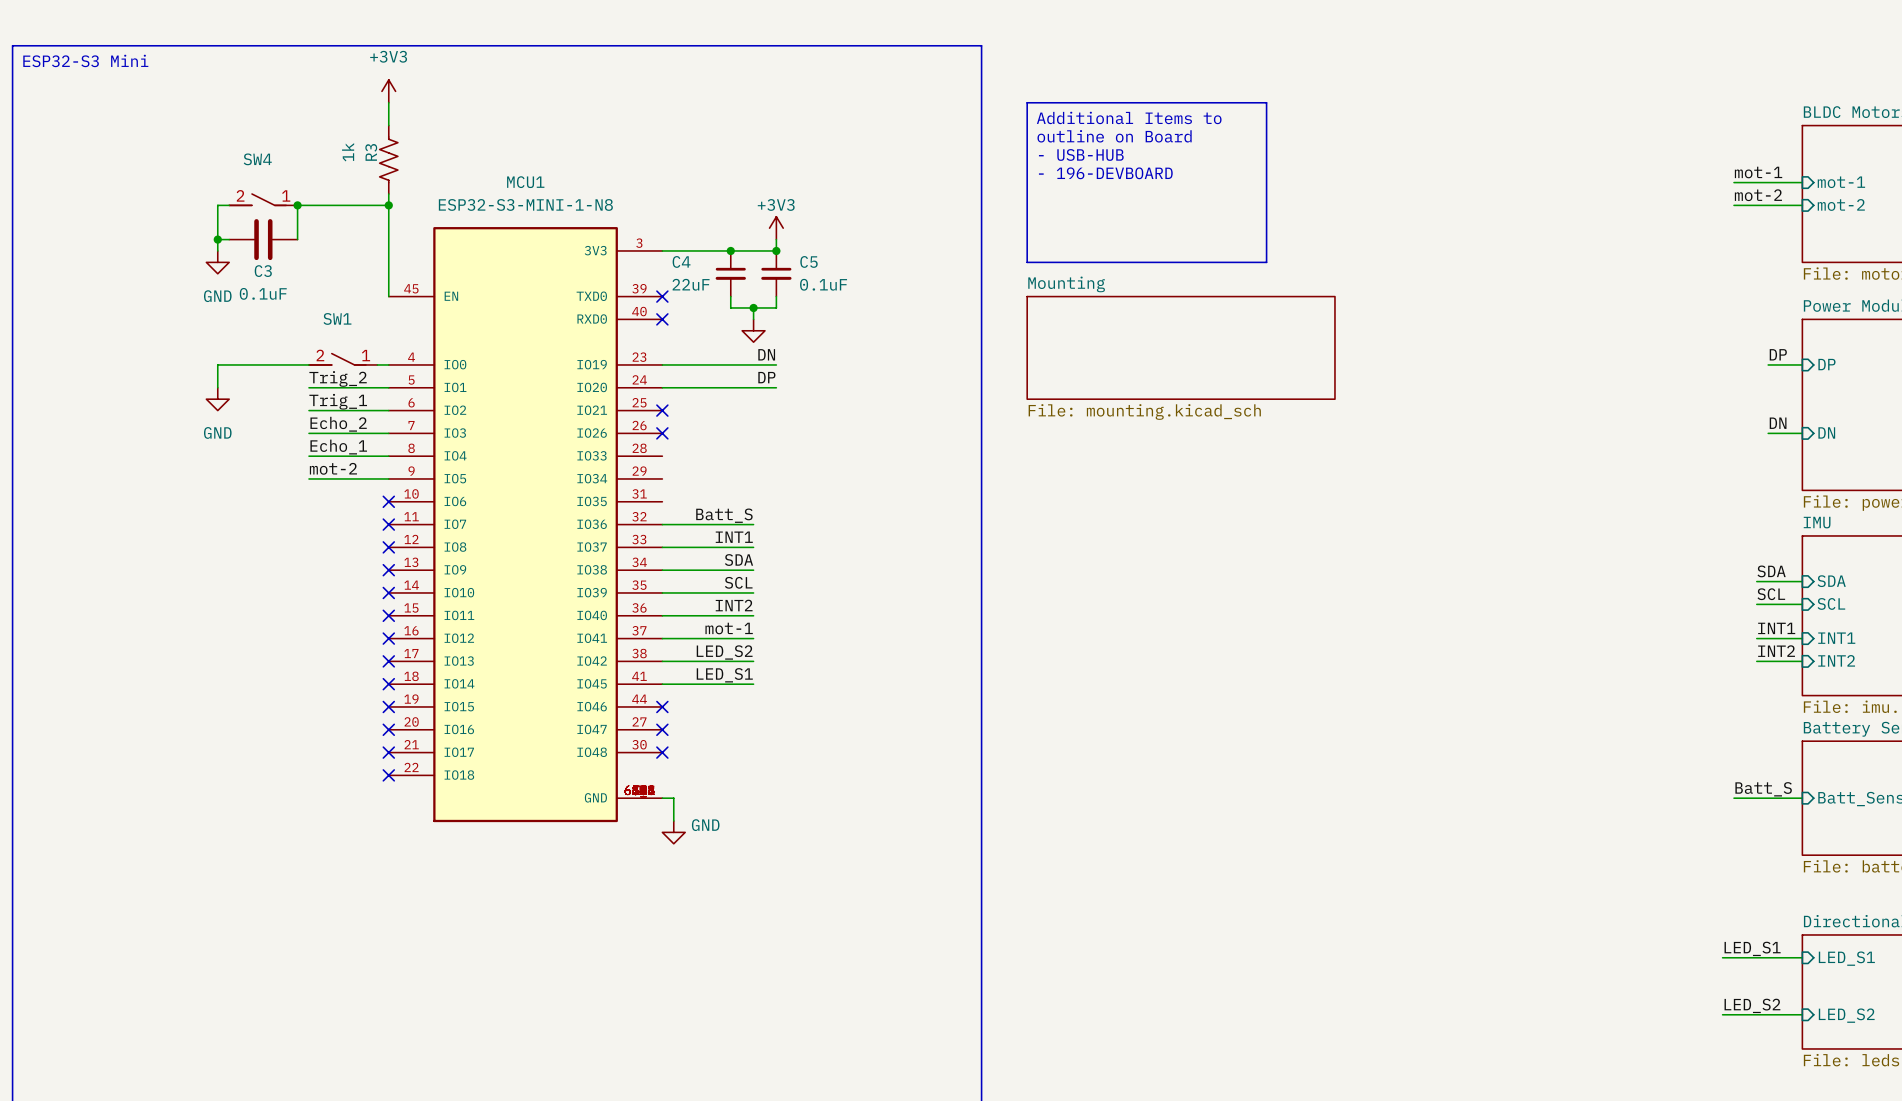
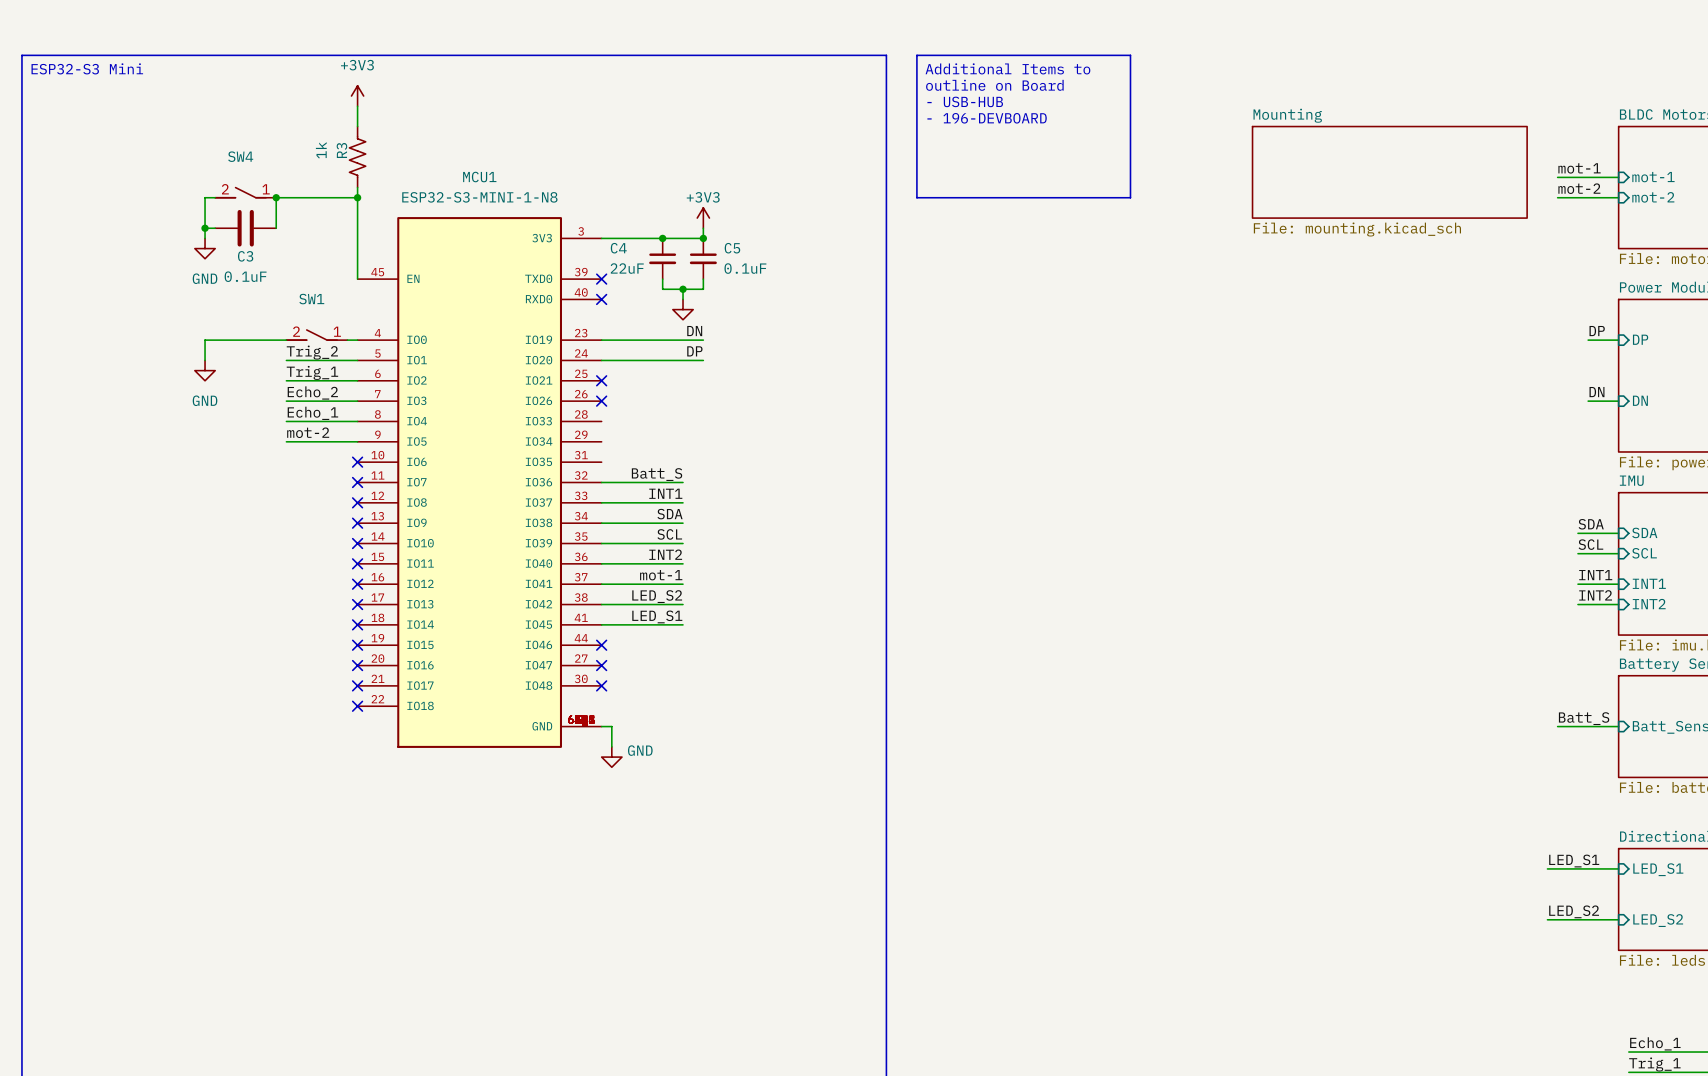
line: (1027, 102) (1266, 102) (1266, 262) (1027, 262) (1027, 102) -> (916, 55) (1130, 55) (1130, 197) (916, 197) (916, 55)
text position: Additional Items to (1129, 117) -> Additional Items to (1007, 68)
text position: outline on Board (1114, 136) -> outline on Board (994, 85)
text position: - USB-HUB (1081, 154) -> - USB-HUB (965, 101)
text position: - 196-DEVBOARD (1105, 173) -> - 196-DEVBOARD (987, 118)
sheet Mounting: none -> File: mounting.kicad_sch (1389, 172)
sheet Mounting: File: mounting.kicad_sch (1181, 347) -> none

